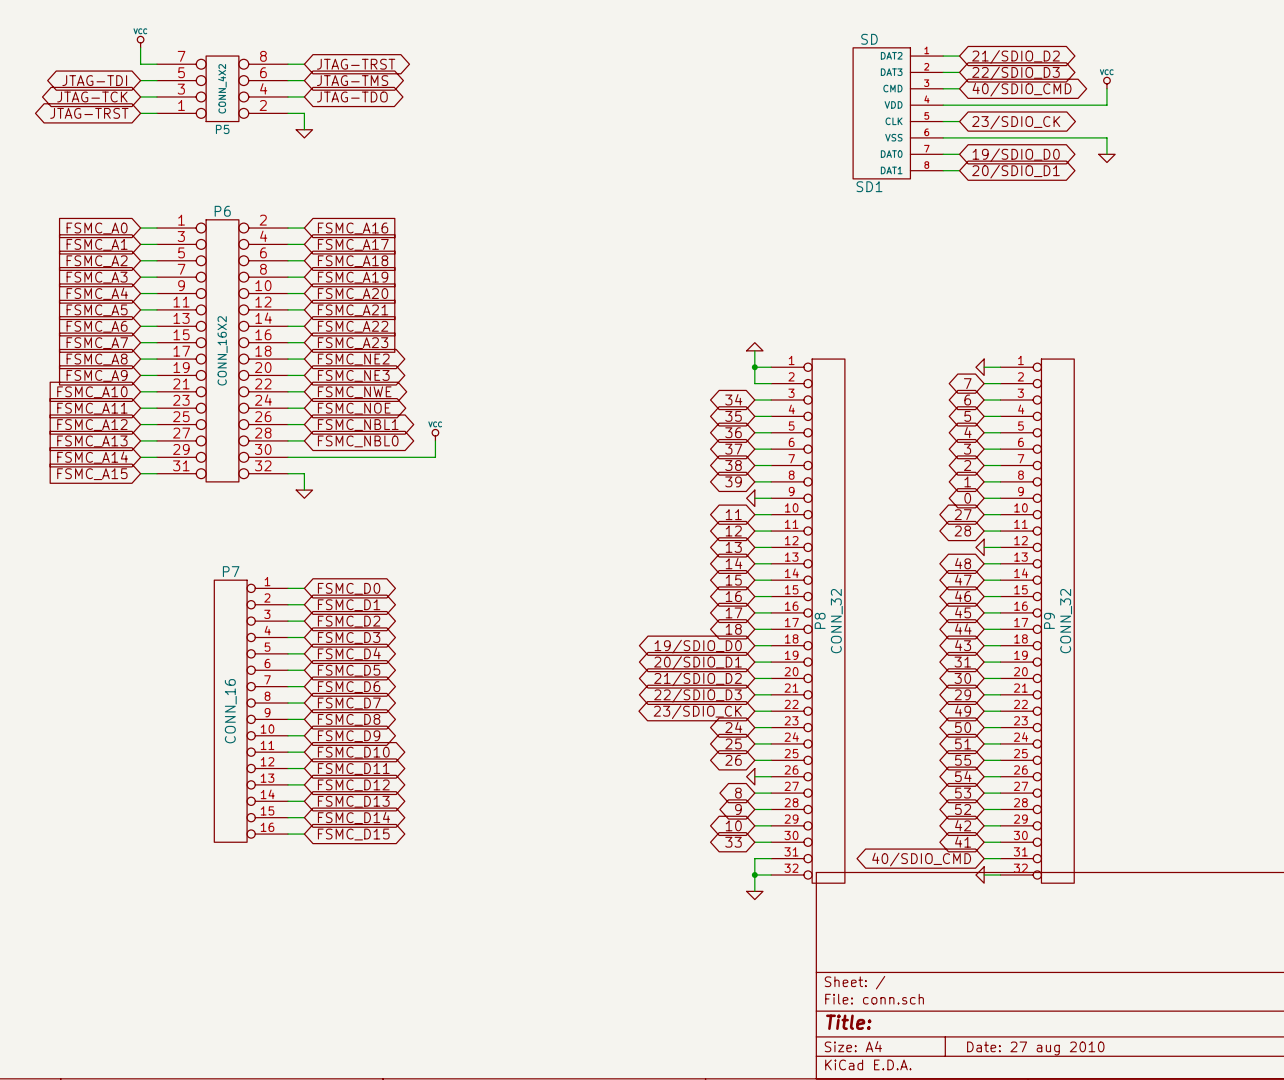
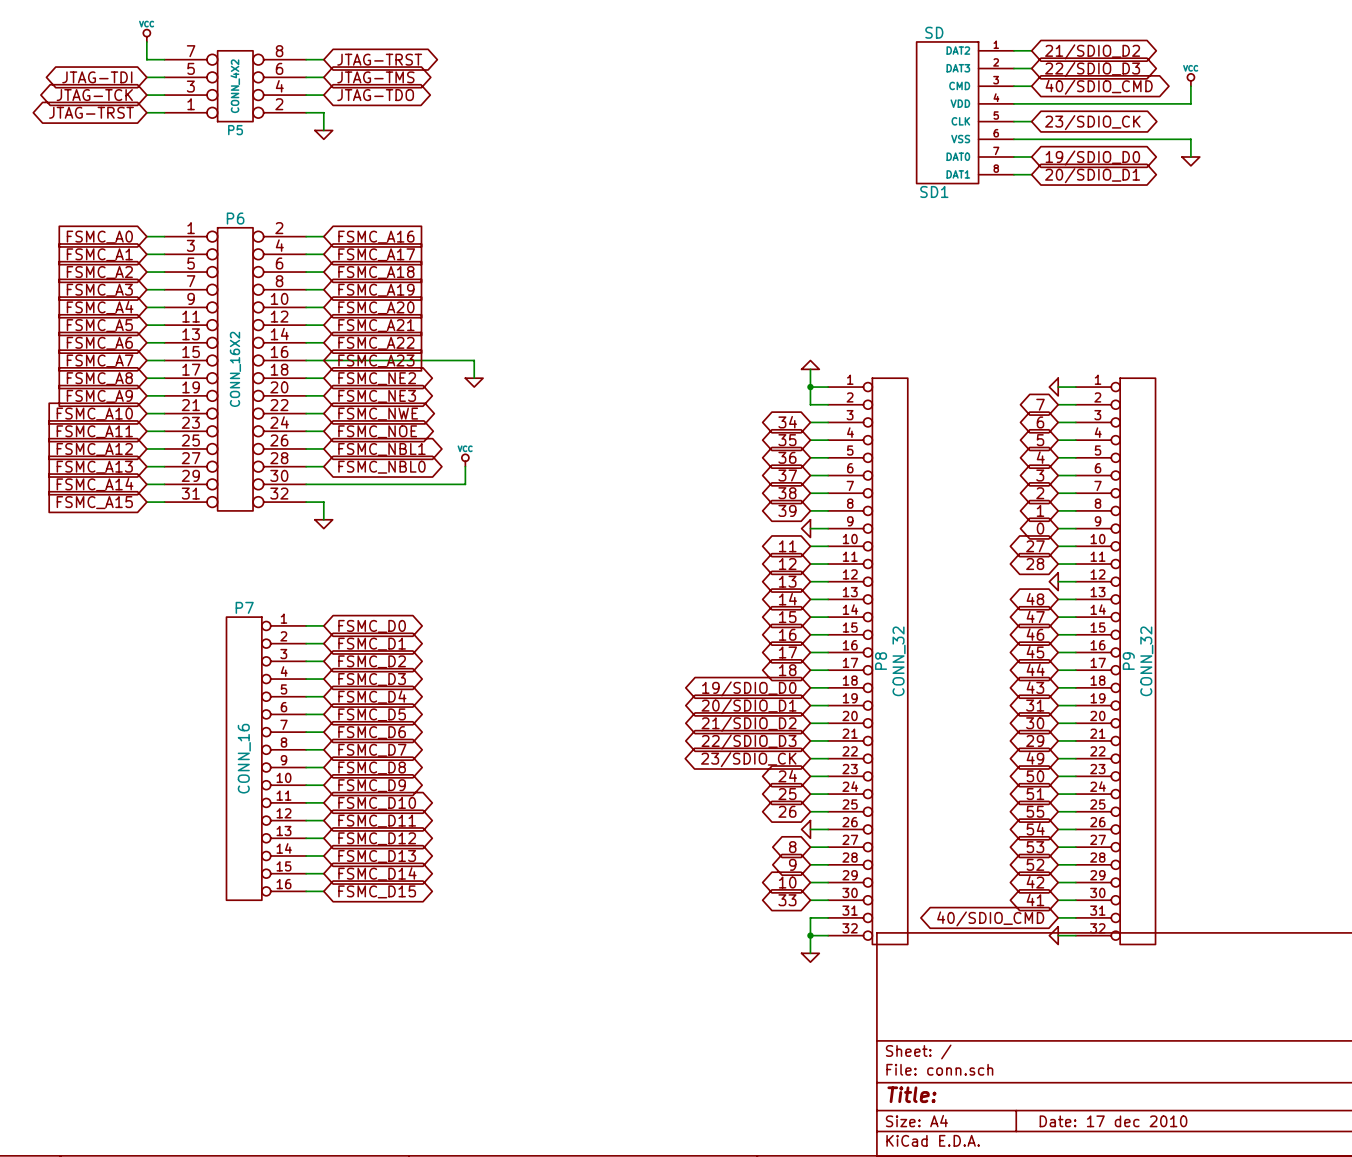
wire: none -> (323, 360) (474, 360) (474, 378)
power symbol: none -> (474, 382)
title block: Date: 27 aug 2010 (1035, 1048) -> Date: 17 dec 2010 (1113, 1121)

